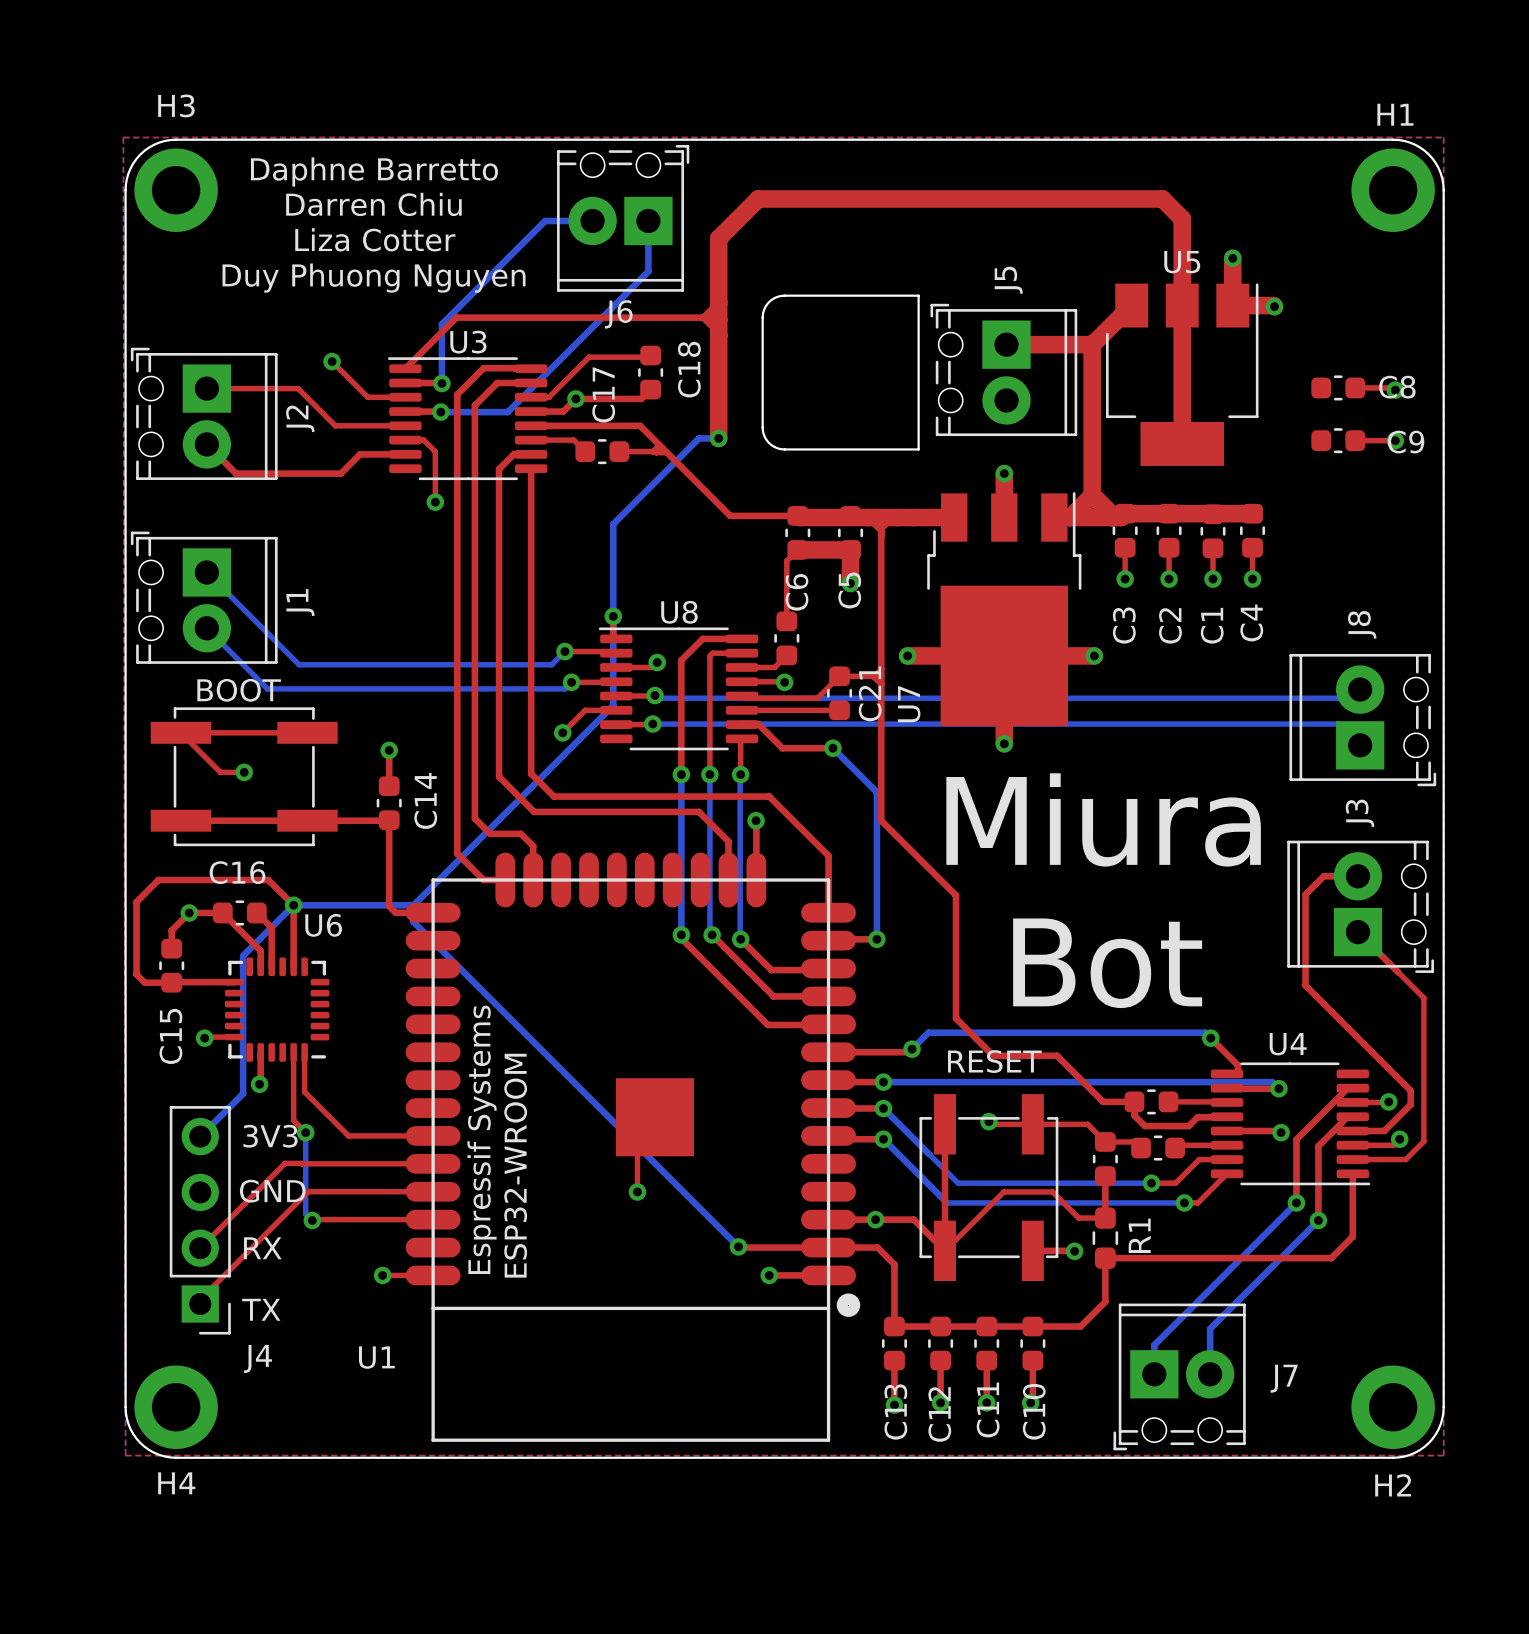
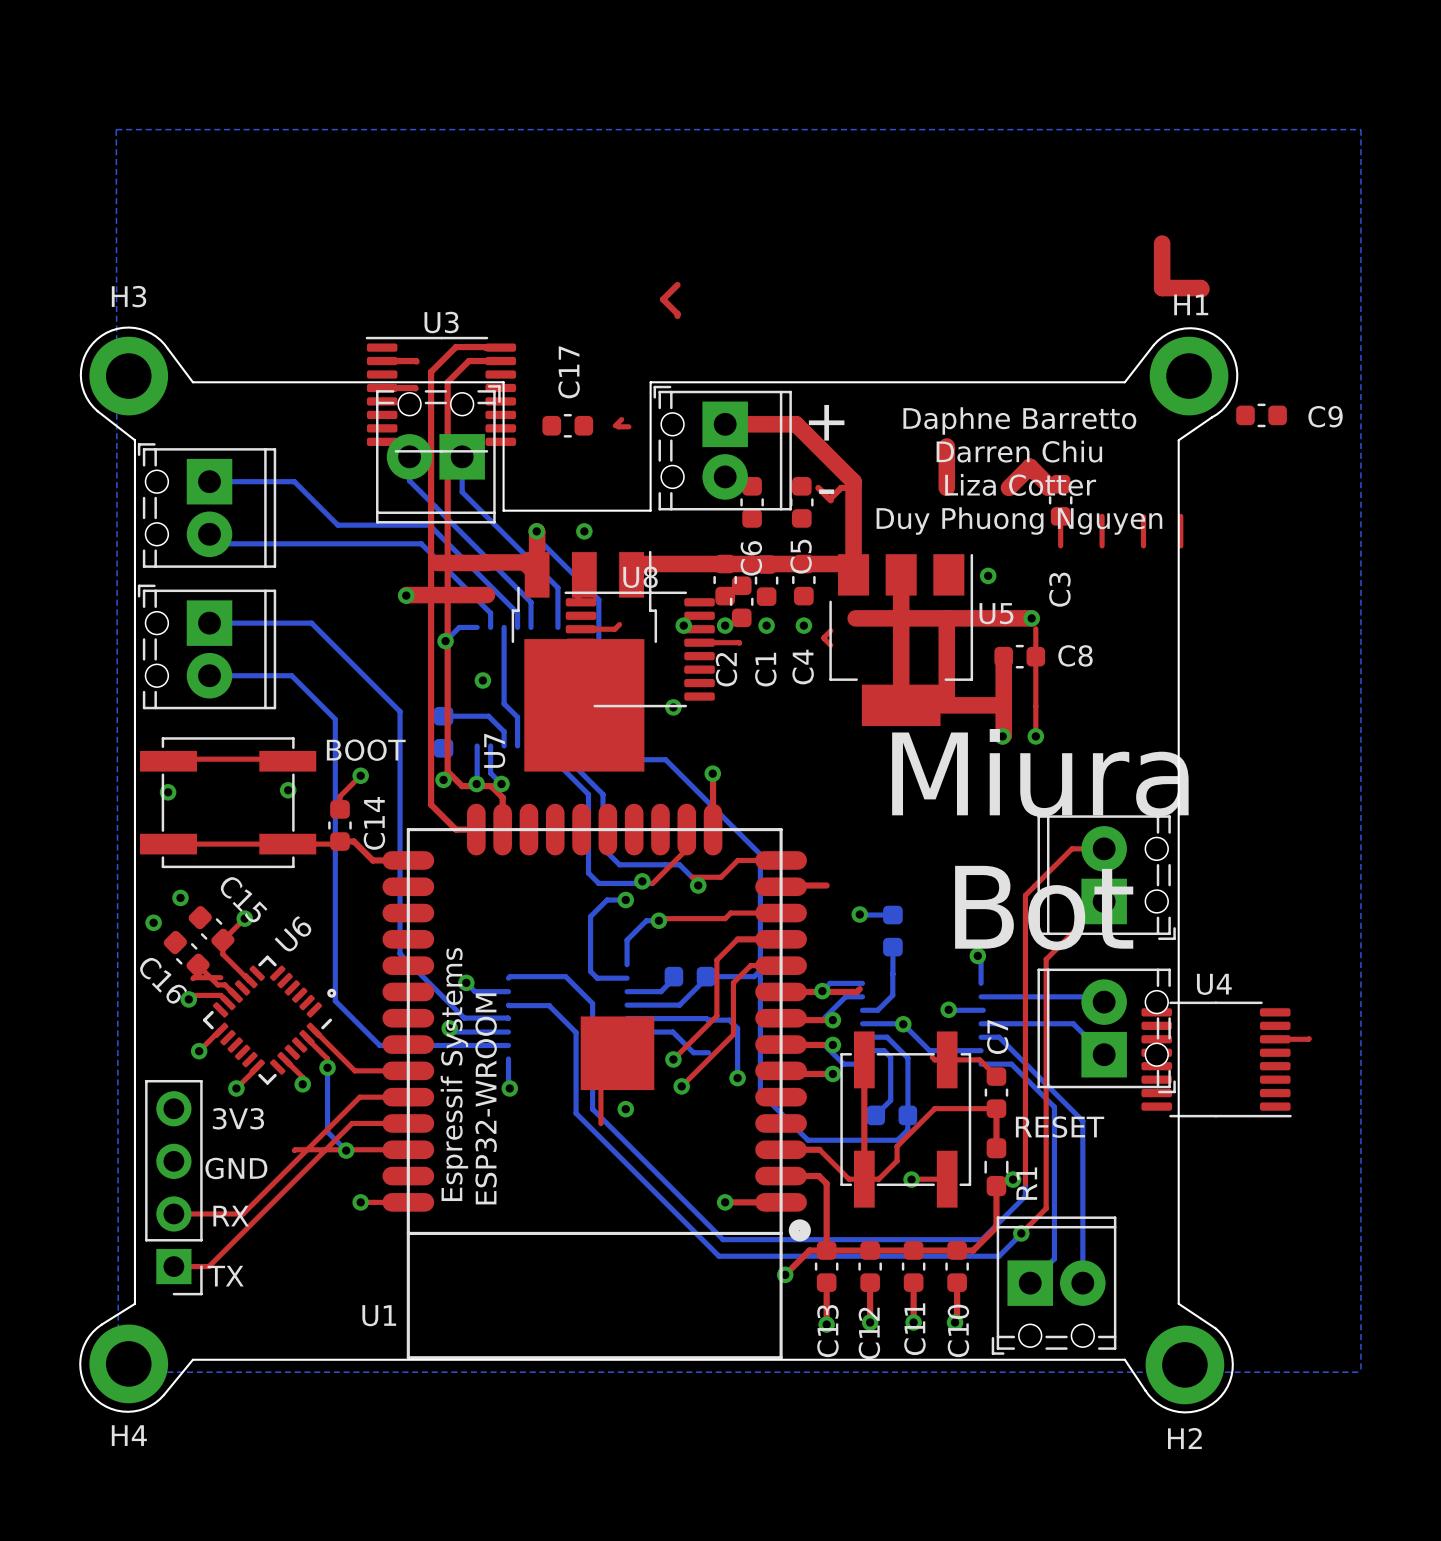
top zone outline: (123, 137) (125, 1455) (1443, 1455) (1443, 137) (123, 137) -> none
board edge: (176, 139) (1393, 139) (1409, 142) (1428, 154) (1438, 168) (1443, 190) (1443, 1407) (1440, 1423) (1428, 1442) (1409, 1454) (1393, 1457) (176, 1457) (154, 1452) (140, 1442) (128, 1423) (125, 1407) (125, 190) (128, 173) (140, 154) (159, 142) (176, 139) -> (1153, 345) (1124, 382) (650, 382) (650, 510) (503, 510) (503, 382) (192, 382) (164, 344) (145, 330) (134, 327) (117, 328) (96, 339) (89, 348) (82, 363) (80, 375) (84, 392) (97, 411) (134, 440) (134, 1303) (97, 1328) (83, 1346) (80, 1369) (85, 1386) (92, 1395) (100, 1403) (116, 1410) (128, 1411) (145, 1408) (159, 1399) (192, 1359) (1124, 1359) (1149, 1395) (1167, 1409) (1190, 1412) (1207, 1407) (1216, 1400) (1227, 1386) (1231, 1375) (1232, 1364) (1229, 1347) (1215, 1328) (1178, 1303) (1178, 440) (1225, 406) (1234, 391) (1237, 373) (1233, 356) (1226, 345) (1213, 334) (1202, 329) (1178, 329) (1162, 336) (1153, 345)
text: Daphne Barretto (374, 171) -> none
H3 position: (176, 190) -> (128, 376)
H1 position: (1393, 190) -> (1189, 376)
text: Darren Chiu (373, 204) -> none
J6: (623, 218) -> none
bottom track: (592, 220) (545, 220) (441, 324) (441, 383) -> none
bottom track: (648, 220) (648, 271) (507, 412) (440, 412) -> none
text: Liza Cotter (375, 239) -> none
via: (1232, 258) -> none
U5 name position: U5 (1182, 262) -> U5 (996, 613)
text: Duy Phuong Nguyen (374, 278) -> none
board edge: (784, 295) (918, 295) (918, 449) (784, 449) (775, 447) (767, 441) (762, 427) (762, 315) (769, 302) (775, 297) (784, 295) -> none
top track: (1131, 305) (1092, 344) (1006, 344) -> none
via: (1274, 306) -> none
top track: (718, 319) (716, 317) (456, 317) (405, 368) -> none
top track: (1092, 343) (1092, 493) -> none
top track: (650, 355) (648, 357) (589, 357) (549, 397) (531, 397) -> none
top track: (332, 361) (367, 397) (405, 397) -> none
via: (332, 361) -> none
J5: (1003, 369) -> none
C18 side: top (650, 372) -> bottom (443, 732)
U5 position: (1182, 374) -> (901, 640)
via: (441, 383) -> none
C8 position: (1338, 387) -> (1019, 656)
top track: (1357, 387) (1393, 387) (1395, 390) -> none
top track: (206, 388) (298, 388) (335, 425) (405, 425) -> none
top track: (650, 389) (641, 398) (575, 398) (563, 411) (531, 411) -> none
via: (1395, 390) -> none
via: (575, 398) -> none
via: (440, 412) -> none
J2: (204, 413) -> none
top track: (531, 425) (640, 425) (730, 515) (797, 515) -> none
top track: (718, 438) (718, 238) (758, 199) (1162, 199) (1182, 218) (1182, 443) -> none
bottom track: (718, 438) (698, 438) (613, 524) (613, 705) (413, 905) -> none
via: (718, 438) -> none
top track: (405, 440) (423, 440) (435, 451) (435, 502) -> none
top track: (531, 440) (573, 440) (585, 451) -> none
top track: (1355, 440) (1395, 440) -> none
via: (1395, 440) -> none
top track: (206, 444) (236, 473) (340, 473) (360, 454) (404, 453) -> none
text: none -> Daphne Barretto (1019, 420)
top track: (662, 448) (659, 451) (619, 451) -> none
text: none -> + (826, 422)
top track: none -> (725, 424) (796, 424) (853, 481) (853, 574) (842, 564) (642, 564) (631, 574)
top track: (531, 454) (513, 454) (499, 469) (499, 776) (534, 811) (698, 811) (728, 841) (728, 880) -> (652, 883) (686, 849) (686, 829)
top track: (531, 468) (531, 773) (553, 796) (769, 796) (828, 855) (828, 912) -> (692, 877) (721, 877) (737, 860) (781, 860)
via: (1004, 473) -> none
part: none -> (722, 448)
text: none -> Darren Chiu (1019, 451)
part: none -> (438, 454)
bottom track: none -> (409, 456) (409, 480) (531, 602) (531, 627)
bottom track: none -> (462, 456) (462, 492) (557, 587) (557, 627)
via: (435, 502) -> none
bottom track: none -> (211, 481) (294, 481) (337, 525) (429, 525) (517, 613) (517, 627)
top track: (1252, 513) (1125, 513) (1121, 517) (1054, 517) -> none
text: none -> Liza Cotter (1020, 484)
top track: (797, 515) (799, 517) (954, 517) -> none
top track: (881, 517) (874, 517) (881, 524) (881, 820) (955, 895) (955, 1018) (993, 1055) (1057, 1055) (1103, 1101) (1134, 1101) (1134, 1115) (1144, 1126) (1188, 1126) (1197, 1117) (1227, 1116) -> none
text: none -> - (826, 491)
C2 position: (1169, 530) -> (725, 580)
C4 position: (1252, 530) -> (803, 580)
C1 position: (1213, 531) -> (766, 580)
part: none -> (207, 505)
text: none -> Duy Phuong Nguyen (1019, 521)
top track: none -> (536, 531) (537, 574) (524, 562) (484, 562)
bottom track: none -> (536, 531) (536, 537) (598, 599) (598, 721) (637, 759) (665, 759) (760, 854) (760, 1093) (808, 1140) (897, 1140) (907, 1129) (907, 1058) (887, 1037) (862, 1037)
via: none -> (536, 531)
via: none -> (584, 531)
bottom track: none -> (211, 534) (221, 543) (421, 543) (490, 613) (490, 627)
bottom track: (206, 572) (299, 664) (551, 664) (564, 651) -> none
via: (1125, 579) -> none
via: (1169, 579) -> none
via: (1213, 579) -> none
via: (1252, 579) -> none
top track: (850, 583) (850, 549) (797, 549) (786, 560) (786, 621) -> none
via: (850, 583) -> none
J1: (204, 597) -> none
top track: none -> (437, 562) (487, 562)
top track: none -> (901, 574) (901, 705) (1003, 706)
U7 position: (1004, 609) -> (584, 661)
via: none -> (988, 575)
via: (613, 616) -> none
bottom track: (206, 628) (267, 688) (564, 688) (571, 682) -> none
via: none -> (406, 595)
top track: none -> (487, 595) (406, 595)
top track: (742, 638) (702, 638) (681, 660) (681, 774) -> none
top track: (564, 651) (614, 651) (616, 653) -> none
via: (564, 651) -> none
top track: (742, 653) (712, 653) (709, 655) (709, 774) -> none
top track: (786, 655) (774, 667) (742, 667) -> none
via: (907, 655) -> none
bottom track: none -> (211, 623) (311, 623) (400, 711) (400, 953) (464, 1018) (508, 1018)
via: (657, 662) -> none
via: none -> (683, 625)
via: none -> (725, 625)
via: none -> (766, 625)
via: none -> (803, 625)
bottom track: none -> (477, 627) (459, 627) (445, 641)
bottom track: none -> (504, 627) (504, 703) (517, 717) (517, 745)
top track: none -> (1035, 628) (1035, 736)
top track: (881, 675) (839, 676) (817, 698) (744, 698) (742, 696) -> none
via: none -> (445, 641)
top track: (616, 681) (571, 682) -> none
via: (571, 682) -> none
via: (784, 682) -> none
part: none -> (207, 646)
bottom track: (1360, 689) (1351, 698) (657, 698) (655, 695) -> none
text position: BOOT (239, 690) -> BOOT (366, 750)
C21 side: top (839, 693) -> bottom (689, 976)
via: (655, 695) -> none
top track: none -> (1003, 656) (1002, 736)
top track: (616, 710) (585, 710) (562, 732) -> none
top track: (742, 710) (839, 710) -> none
bottom track: none -> (211, 675) (291, 675) (335, 719) (335, 1000) (379, 1045) (508, 1045)
J8: (1362, 720) -> none
via: none -> (482, 680)
bottom track: (652, 724) (1338, 724) (1360, 745) (1360, 741) -> none
via: (652, 724) -> none
top track: (742, 724) (758, 724) (782, 748) (832, 748) -> none
top track: (307, 732) (180, 732) (220, 772) (244, 772) -> none
via: (562, 732) -> none
top track: (742, 738) (740, 774) -> none
via: (1004, 743) -> none
bottom track: (832, 748) (876, 792) (876, 939) -> none
via: (832, 748) -> none
top track: (389, 750) (389, 786) -> none
via: (389, 750) -> none
via: none -> (673, 707)
bottom track: none -> (443, 716) (488, 716) (504, 731) (504, 745)
via: (244, 772) -> none
bottom track: (681, 774) (681, 934) -> none
via: (681, 774) -> none
bottom track: (709, 774) (709, 932) (712, 934) -> none
via: (709, 774) -> none
bottom track: (740, 774) (740, 939) -> none
via: (740, 774) -> none
part position: (244, 776) -> (228, 802)
via: none -> (1002, 736)
via: none -> (1035, 736)
bottom track: none -> (477, 745) (476, 784)
bottom track: none -> (490, 745) (490, 773) (501, 784)
bottom track: none -> (557, 745) (557, 763) (588, 794) (588, 873) (598, 883) (652, 883)
bottom track: none -> (571, 745) (571, 762) (602, 794) (602, 848) (619, 864) (679, 864) (692, 877)
C14 position: (389, 803) -> (339, 825)
top track: none -> (168, 759) (287, 759)
top track: (180, 820) (389, 820) (389, 906) -> (339, 841) (353, 841) (366, 854)
top track: none -> (360, 775) (339, 796) (339, 809)
via: none -> (360, 775)
via: none -> (443, 779)
via: none -> (476, 784)
via: none -> (501, 784)
via: none -> (288, 790)
via: none -> (168, 792)
C16 name position: C16 (237, 872) -> C16 (163, 980)
top track: (1357, 876) (1323, 876) (1305, 894) (1305, 985) (1410, 1090) (1410, 1104) (1384, 1131) (1363, 1131) -> none
top track: none -> (168, 844) (331, 844)
top track: none -> (1104, 848) (1071, 848) (1025, 895) (1025, 1183)
via: (293, 905) -> none
bottom track: (413, 905) (413, 921) (738, 1246) -> none
bottom track: (413, 905) (293, 905) (243, 955) (243, 1093) (200, 1136) -> none
J3: (1360, 906) -> none
via: (189, 912) -> none
C16 rotation: 0° (239, 912) -> 45° clockwise (186, 953)
C16 position: (239, 912) -> (186, 953)
top track: (256, 912) (271, 927) (271, 966) -> none
part: none -> (1106, 877)
top track: (681, 934) (681, 938) (767, 1025) (828, 1024) -> (681, 1086) (733, 1034) (733, 982) (750, 965) (781, 965)
top track: (712, 934) (773, 996) (782, 996) -> (673, 1059) (716, 1015) (716, 960) (737, 939)
via: (712, 934) -> none
top track: (740, 939) (771, 970) (828, 968) -> (658, 920) (660, 918) (725, 918) (730, 913) (781, 913)
via: (876, 939) -> none
top track: (171, 948) (171, 930) (189, 912) (222, 912) (260, 950) (260, 966) -> none
via: none -> (180, 897)
bottom track: none -> (625, 900) (607, 900) (590, 916) (590, 971) (597, 978) (627, 978)
via: none -> (625, 900)
top track: none -> (1104, 901) (1046, 959) (1046, 1208) (1021, 1233)
C15 rotation: 0° (171, 965) -> 45° counterclockwise (211, 929)
C15 position: (171, 965) -> (211, 929)
top track: (293, 966) (293, 905) (268, 880) (158, 880) (136, 901) (136, 974) (144, 982) (234, 982) -> none
bottom track: none -> (859, 914) (892, 915)
via: none -> (859, 914)
top track: (1398, 972) (1357, 932) (1423, 997) (1423, 1141) (1405, 1159) (1352, 1159) -> none
top track: none -> (244, 918) (223, 940) (222, 954) (249, 980)
via: none -> (244, 918)
bottom track: none -> (658, 920) (646, 920) (627, 940) (627, 964)
via: none -> (658, 920)
via: none -> (153, 922)
bottom track: none -> (892, 947) (892, 973)
U6 rotation: 0° (277, 1009) -> 45° counterclockwise (267, 1020)
U6 position: (277, 1009) -> (267, 1020)
bottom track: none -> (977, 955) (981, 959) (981, 983)
via: none -> (977, 955)
top track: none -> (198, 965) (217, 984) (224, 984) (235, 995)
bottom track: none -> (760, 971) (754, 976) (706, 976)
bottom track: none -> (892, 974) (892, 995) (877, 1010) (862, 1010)
C15 name position: C15 (170, 1036) -> C15 (244, 899)
bottom track: none -> (508, 978) (510, 976) (565, 976) (592, 1003) (592, 1109) (723, 1239) (981, 1239) (1025, 1196) (1025, 1183)
via position: (204, 1038) -> (188, 999)
bottom track: none -> (673, 978) (660, 991) (627, 991)
bottom track: none -> (706, 978) (679, 1005) (627, 1005)
top track: (1210, 1038) (1237, 1065) (1237, 1073) -> none
bottom track: (1210, 1038) (1205, 1032) (928, 1032) (912, 1049) -> none
via: (1210, 1038) -> none
bottom track: none -> (466, 982) (475, 991) (508, 991)
via: none -> (466, 982)
bottom track: none -> (862, 983) (830, 983) (822, 991)
drawing: none -> [327, 988, 337, 998]
via: (912, 1049) -> none
via: none -> (822, 991)
top track: (260, 1052) (259, 1084) -> none
top track: (293, 1052) (293, 1120) (305, 1132) -> none
top track: (304, 1052) (304, 1092) (348, 1135) (376, 1135) -> (314, 1030) (354, 1070)
bottom track: none -> (862, 996) (845, 996) (824, 1018)
bottom track: none -> (981, 996) (1098, 996) (1104, 1002)
top track: none -> (188, 999) (192, 995) (220, 995) (227, 1002)
text position: RESET (994, 1061) -> RESET (1060, 1127)
bottom track: none -> (508, 1005) (549, 1005) (576, 1032) (576, 1113) (718, 1256) (999, 1256) (1021, 1233)
bottom track: none -> (947, 1010) (983, 1010)
via: none -> (948, 1009)
bottom track: none -> (627, 1018) (729, 1020) (737, 1028) (737, 1078)
via: (259, 1084) -> none
bottom track: (885, 1084) (883, 1082) (1272, 1082) (1278, 1088) -> none
bottom track: none -> (862, 1023) (902, 1023) (929, 1050) (981, 1050)
bottom track: none -> (981, 1023) (1073, 1023) (1104, 1054)
via: none -> (903, 1024)
top track: (1237, 1088) (1278, 1088) -> none
via: (1278, 1088) -> none
top track: (1363, 1088) (1347, 1088) (1296, 1139) (1296, 1202) -> none
bottom track: none -> (449, 1028) (453, 1032) (508, 1032)
via: none -> (449, 1028)
top track: none -> (220, 1030) (199, 1051)
part: none -> (1106, 1030)
bottom track: none -> (627, 1032) (672, 1032) (693, 1052) (708, 1052)
top track: none -> (307, 1037) (327, 1058) (327, 1067)
bottom track: none -> (981, 1037) (999, 1037) (1082, 1120) (1082, 1283)
part side: top (1151, 1101) -> bottom (891, 1115)
top track: (1168, 1101) (1227, 1102) -> none
via: (1388, 1101) -> none
bottom track: none -> (824, 1044) (843, 1064) (862, 1064)
bottom track: (883, 1108) (958, 1183) (1151, 1183) -> none
bottom track: none -> (862, 1050) (883, 1050) (890, 1057) (890, 1100) (875, 1115)
via: none -> (199, 1051)
top track: (1363, 1116) (1347, 1116) (1318, 1146) (1318, 1220) -> none
via: (988, 1121) -> none
bottom track: none -> (508, 1058) (509, 1088)
via: none -> (673, 1059)
top track: none -> (285, 1059) (302, 1077) (302, 1084)
top track: (944, 1124) (944, 1250) -> (864, 1059) (864, 1179)
top track: (1039, 1124) (1087, 1124) (1105, 1141) (1135, 1141) (1141, 1148) -> (979, 1059) (996, 1076)
bottom track: none -> (981, 1064) (1011, 1064) (1054, 1107) (1054, 1258) (1030, 1283)
top track: none -> (257, 1066) (236, 1088)
top track: (1237, 1131) (1279, 1131) (1281, 1132) -> none
bottom track: (305, 1132) (305, 1213) (312, 1220) -> none
via: (305, 1132) -> none
bottom track: none -> (327, 1067) (327, 1131) (346, 1150)
via: none -> (327, 1067)
via: (1281, 1132) -> none
text position: 3V3 (270, 1136) -> 3V3 (238, 1118)
bottom track: (883, 1139) (947, 1202) (1184, 1202) -> none
top track: (1399, 1139) (1393, 1145) (1352, 1145) -> none
via: (1399, 1139) -> none
via: none -> (737, 1078)
top track: (1227, 1145) (1180, 1145) (1175, 1150) -> none
part side: top (1158, 1148) -> bottom (892, 931)
via: none -> (302, 1084)
via: none -> (681, 1086)
via: none -> (236, 1088)
via: none -> (509, 1088)
C7: none -> (996, 1092)
part: (1105, 1159) -> none
top track: (1227, 1159) (1199, 1159) (1175, 1183) (1151, 1183) -> none
top track: (381, 1163) (285, 1163) (200, 1248) -> (359, 1097) (243, 1213) (173, 1213)
top track: (1227, 1173) (1197, 1202) (1184, 1202) -> none
top track: (1352, 1173) (1352, 1236) (1331, 1258) (1105, 1258) (1105, 1301) (1080, 1326) (1032, 1326) -> (996, 1186) (996, 1227) (973, 1250)
top track: (1105, 1175) (1105, 1217) -> (996, 1108) (996, 1147)
via: (1151, 1183) -> none
part position: (988, 1187) -> (905, 1119)
text position: GND (272, 1191) -> GND (236, 1168)
top track: (373, 1191) (308, 1191) (200, 1299) (200, 1304) -> (352, 1123) (208, 1266) (173, 1266)
via position: (637, 1191) -> (625, 1109)
via: (1184, 1202) -> none
bottom track: (1296, 1202) (1154, 1345) (1154, 1374) -> none
via: (1296, 1202) -> none
top track: (1105, 1218) (1078, 1218) (1052, 1191) (1003, 1191) (944, 1250) -> none
top track: (869, 1219) (913, 1219) (944, 1250) -> (819, 1149) (849, 1179) (878, 1179) (897, 1160) (897, 1146) (934, 1108) (996, 1108)
via: (875, 1219) -> none
J4: (200, 1220) -> none
via: (312, 1220) -> none
via: none -> (346, 1150)
bottom track: (1318, 1220) (1210, 1328) (1210, 1374) -> none
via: (1318, 1220) -> none
R1 name position: R1 (1139, 1235) -> R1 (1026, 1183)
R1 position: (1105, 1238) -> (996, 1167)
top track: (738, 1246) (828, 1247) -> none
via: (738, 1246) -> none
top track: (868, 1247) (877, 1247) (894, 1264) (894, 1326) -> (818, 1176) (826, 1183) (826, 1250)
text position: RX (262, 1248) -> RX (231, 1216)
top track: none -> (947, 1179) (911, 1179)
top track: (1032, 1250) (1074, 1251) -> none
via: none -> (911, 1179)
part: none -> (173, 1187)
via: none -> (1021, 1233)
text position: TX (261, 1309) -> TX (225, 1276)
top track: none -> (843, 1250) (809, 1250) (785, 1274)
C13 position: (894, 1343) -> (826, 1266)
C12 position: (940, 1343) -> (870, 1266)
C11 position: (986, 1343) -> (913, 1266)
C10 position: (1032, 1343) -> (957, 1266)
via: none -> (785, 1274)
U1 name position: U1 (376, 1357) -> U1 (379, 1315)
top track: (894, 1360) (894, 1405) -> (826, 1282) (826, 1324)
top track: (940, 1360) (940, 1402) -> (870, 1282) (870, 1322)
top track: (986, 1360) (986, 1402) -> (913, 1282) (913, 1322)
top track: (1032, 1360) (1032, 1400) (1030, 1402) -> (957, 1282) (957, 1320) (955, 1322)
part: none -> (1054, 1285)
J7: (1179, 1376) -> none
via position: (940, 1402) -> (870, 1322)
via position: (986, 1402) -> (913, 1322)
via position: (1030, 1402) -> (955, 1322)
via position: (894, 1405) -> (826, 1324)
H4 position: (176, 1407) -> (128, 1363)
H2 position: (1393, 1407) -> (1184, 1364)

